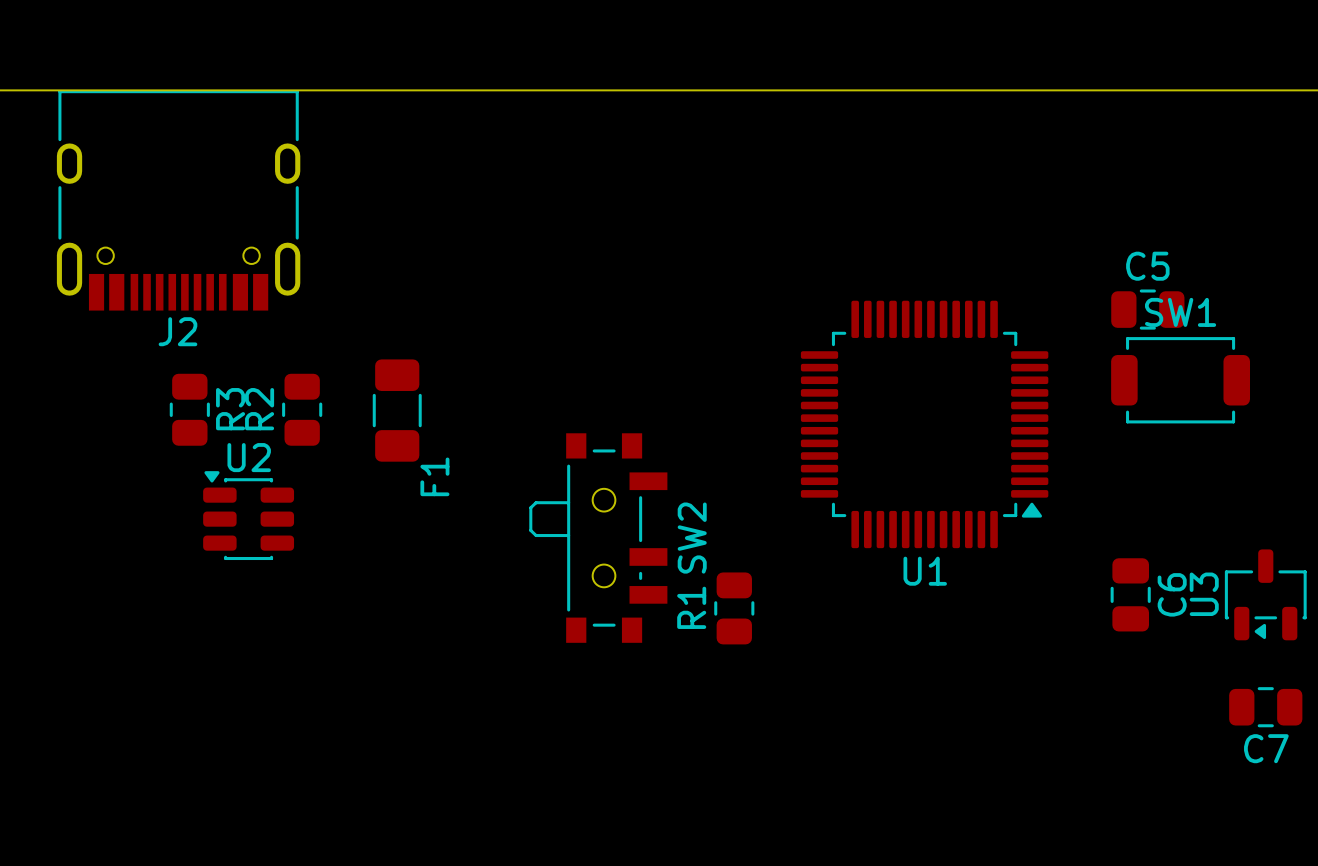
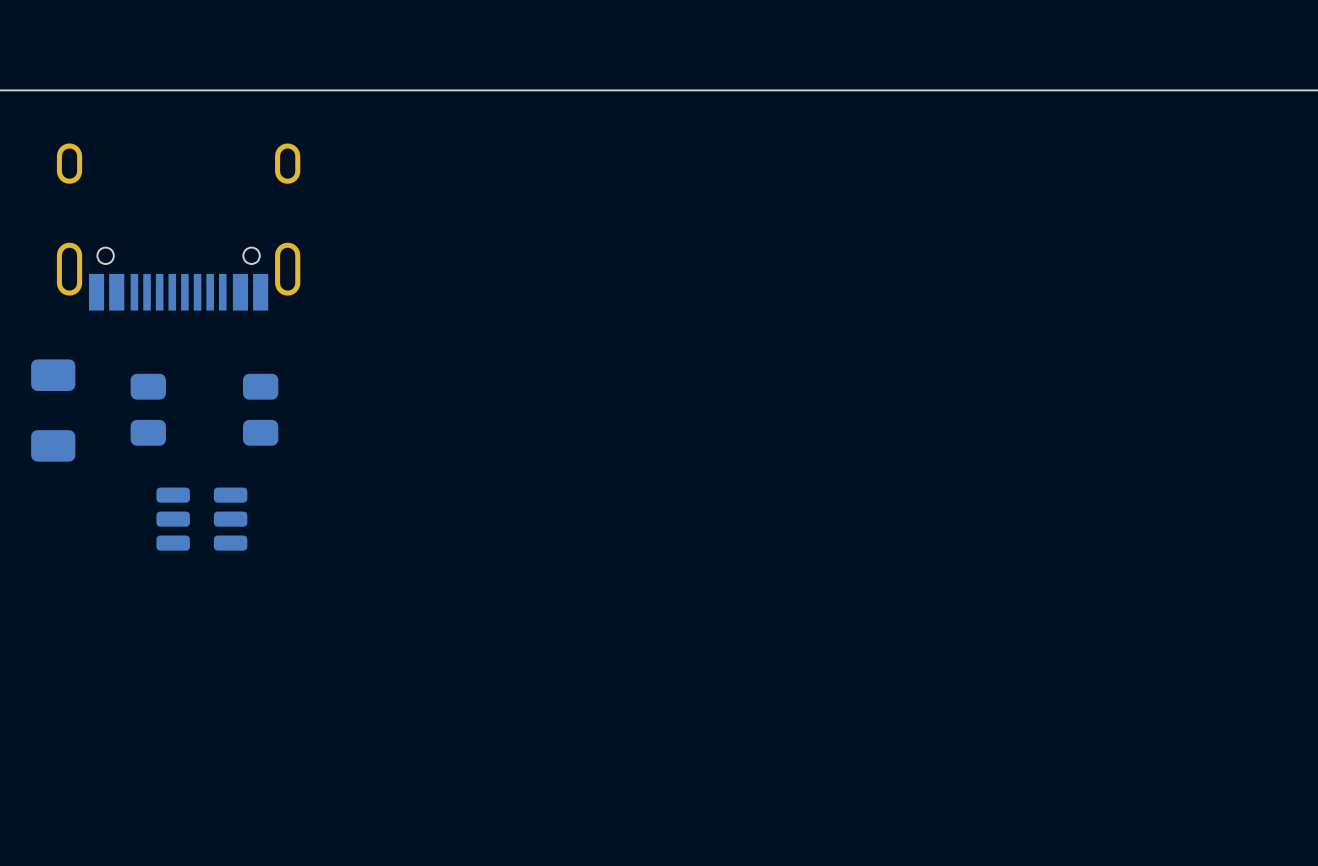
J2 side: top (178, 200) -> bottom (178, 227)
C5: (1147, 309) -> none
SW1: (1180, 380) -> none
R3 side: top (189, 409) -> bottom (260, 409)
R2 side: top (302, 409) -> bottom (148, 409)
F1 side: top (397, 410) -> bottom (53, 410)
U1: (924, 424) -> none
U2 side: top (248, 515) -> bottom (201, 519)
SW2: (598, 538) -> none
C6: (1130, 594) -> none
U3: (1265, 594) -> none
R1: (734, 608) -> none
C7: (1265, 707) -> none

